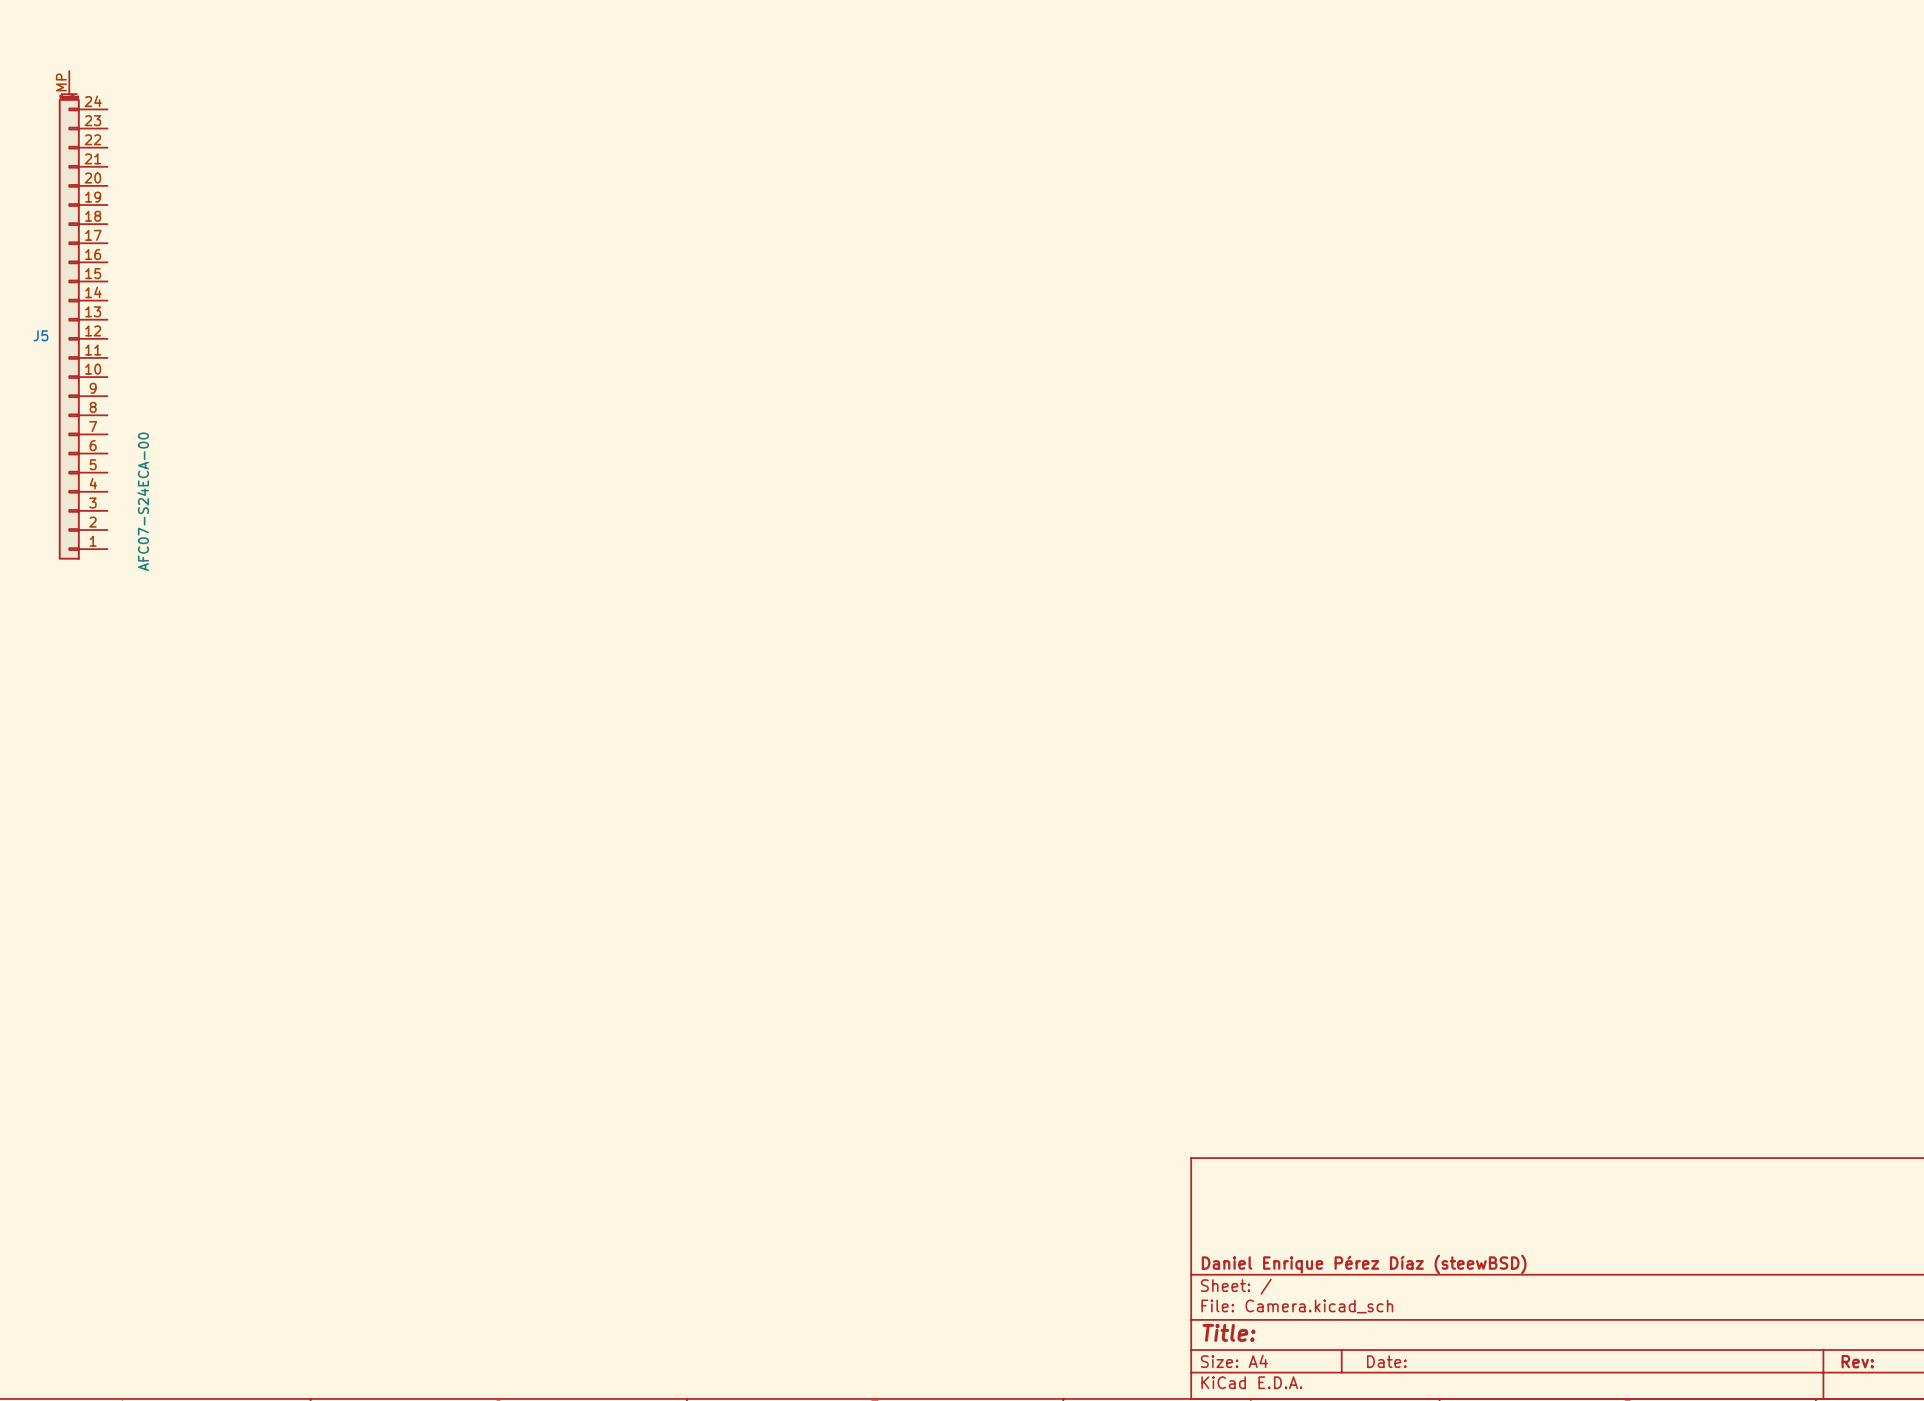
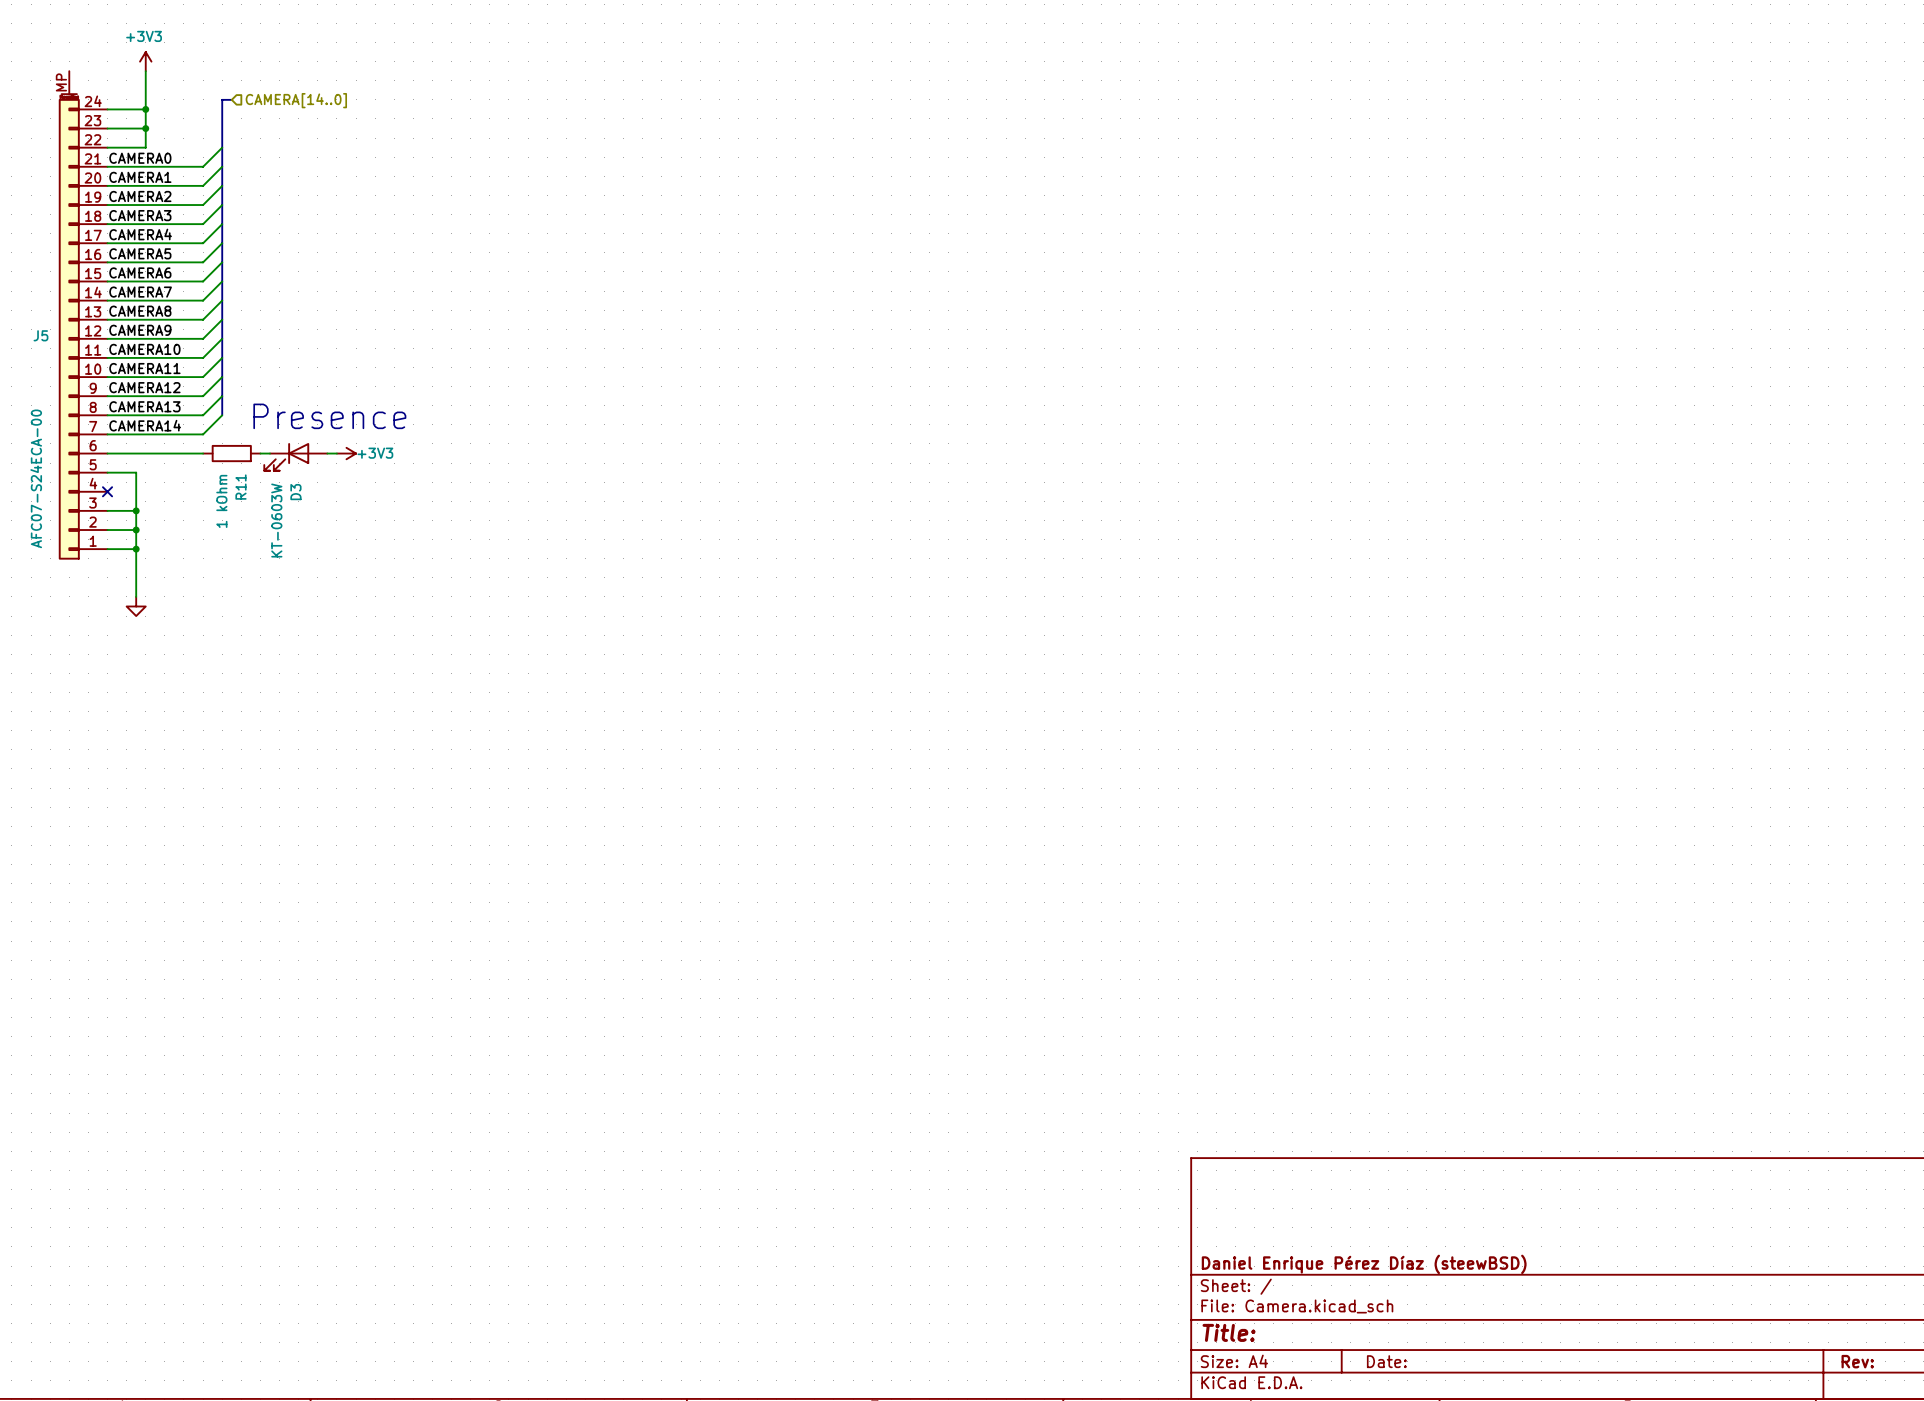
power symbol: none -> +3V3 (145, 61)
wire: none -> (145, 71) (145, 147) (107, 147)
bus: none -> (231, 99) (222, 99) (222, 415)
hierarchical label: none -> CAMERA[14..0] (296, 100)
wire: none -> (107, 109) (145, 109)
junction: none -> (145, 109)
wire: none -> (107, 128) (145, 128)
junction: none -> (145, 128)
wire: none -> (222, 147) (203, 166) (107, 166)
label: none -> CAMERA0 (140, 158)
wire: none -> (222, 166) (203, 185) (107, 185)
label: none -> CAMERA1 (140, 177)
wire: none -> (222, 185) (203, 205) (107, 205)
label: none -> CAMERA2 (140, 196)
wire: none -> (222, 205) (203, 224) (107, 224)
label: none -> CAMERA3 (140, 215)
wire: none -> (222, 224) (203, 243) (107, 243)
label: none -> CAMERA4 (140, 234)
wire: none -> (222, 243) (203, 262) (107, 262)
label: none -> CAMERA5 (140, 253)
wire: none -> (222, 262) (203, 281) (107, 281)
label: none -> CAMERA6 (140, 272)
wire: none -> (222, 281) (203, 300) (107, 300)
label: none -> CAMERA7 (140, 292)
wire: none -> (222, 300) (203, 319) (107, 319)
label: none -> CAMERA8 (140, 311)
wire: none -> (222, 319) (203, 338) (107, 338)
label: none -> CAMERA9 (140, 330)
wire: none -> (222, 338) (203, 357) (107, 357)
label: none -> CAMERA10 (144, 349)
wire: none -> (222, 357) (203, 377) (107, 377)
label: none -> CAMERA11 (144, 368)
wire: none -> (222, 377) (203, 396) (107, 396)
label: none -> CAMERA12 (144, 387)
wire: none -> (222, 396) (203, 415) (107, 415)
label: none -> CAMERA13 (144, 406)
wire: none -> (222, 415) (203, 434) (107, 434)
text: none -> Presence (329, 416)
label: none -> CAMERA14 (145, 425)
wire: none -> (107, 453) (203, 453)
R11: none -> 1 kOhm (231, 453)
wire: none -> (260, 453) (270, 453)
wire: none -> (327, 453) (336, 453)
power symbol: none -> +3V3 (346, 453)
D3: none -> KT-0603W (295, 456)
wire: none -> (107, 472) (136, 472) (136, 596)
no-connect mark: none -> (107, 491)
J5 text position: AFC07-S24ECA-00 (143, 501) -> AFC07-S24ECA-00 (36, 478)
wire: none -> (107, 510) (136, 510)
junction: none -> (136, 510)
wire: none -> (107, 530) (136, 530)
junction: none -> (136, 530)
wire: none -> (107, 549) (136, 549)
junction: none -> (136, 549)
power symbol: none -> (136, 606)

